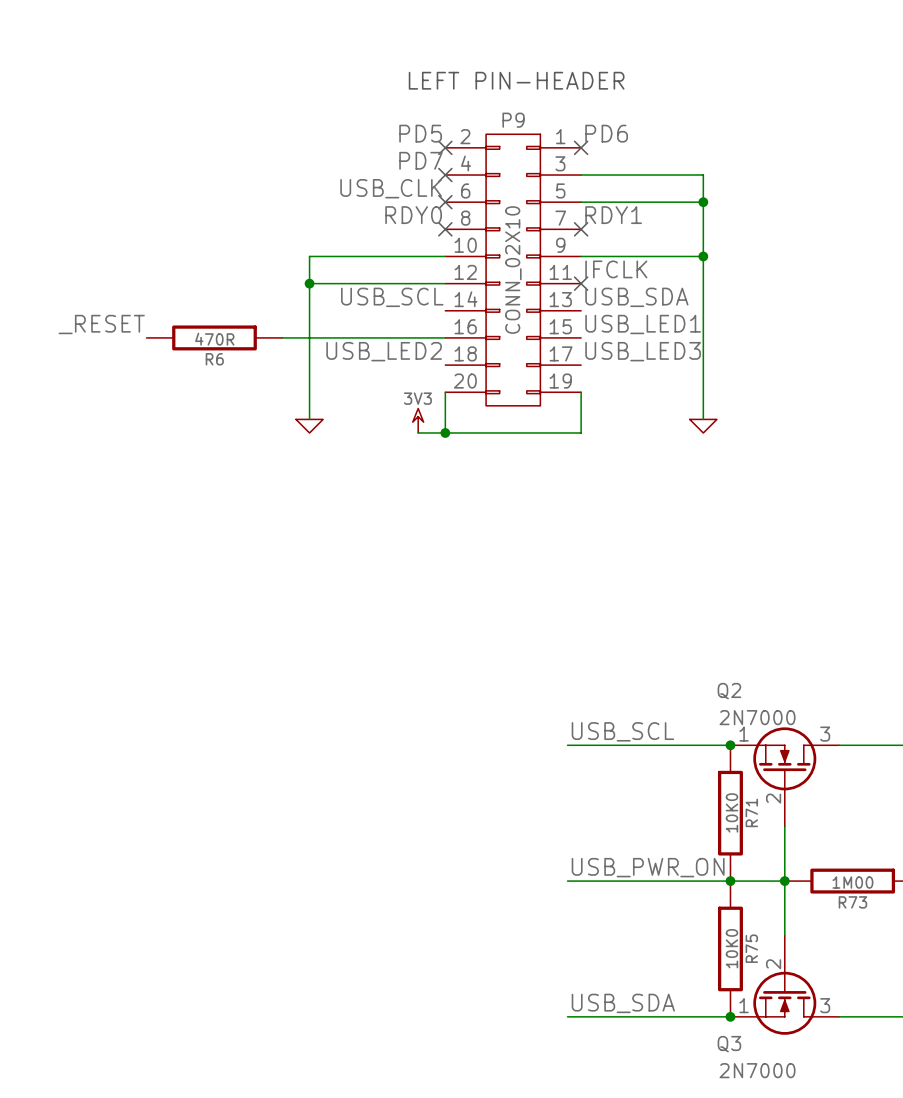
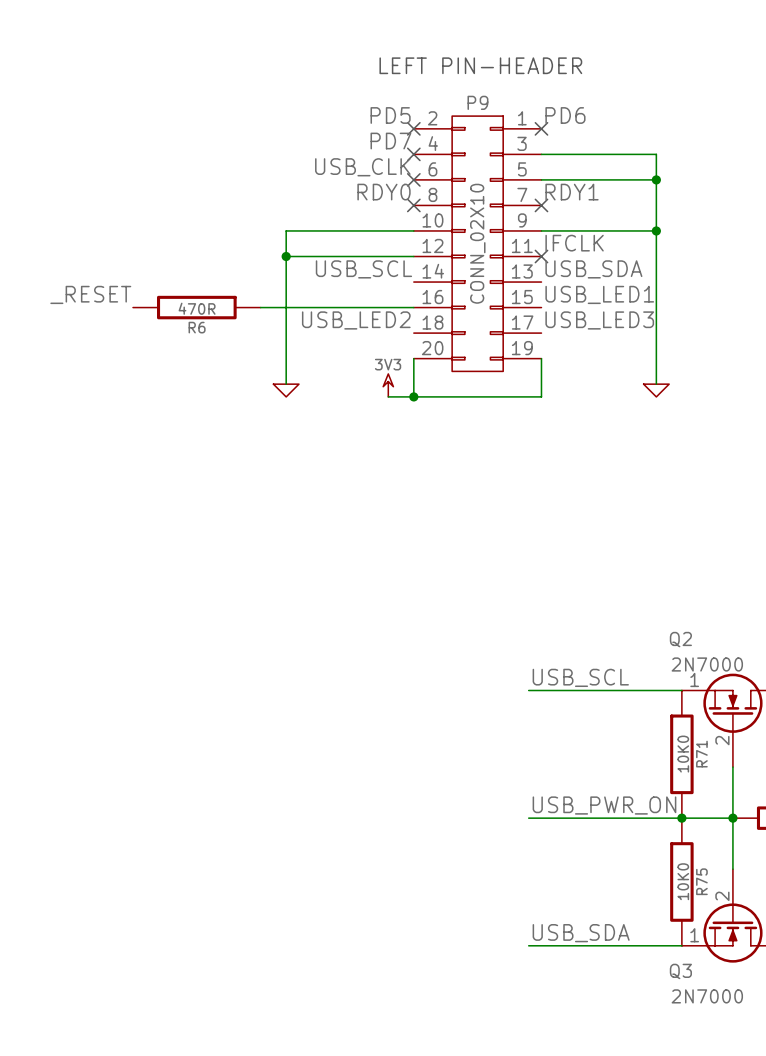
junction: (730, 745) -> none
junction: (730, 1016) -> none

